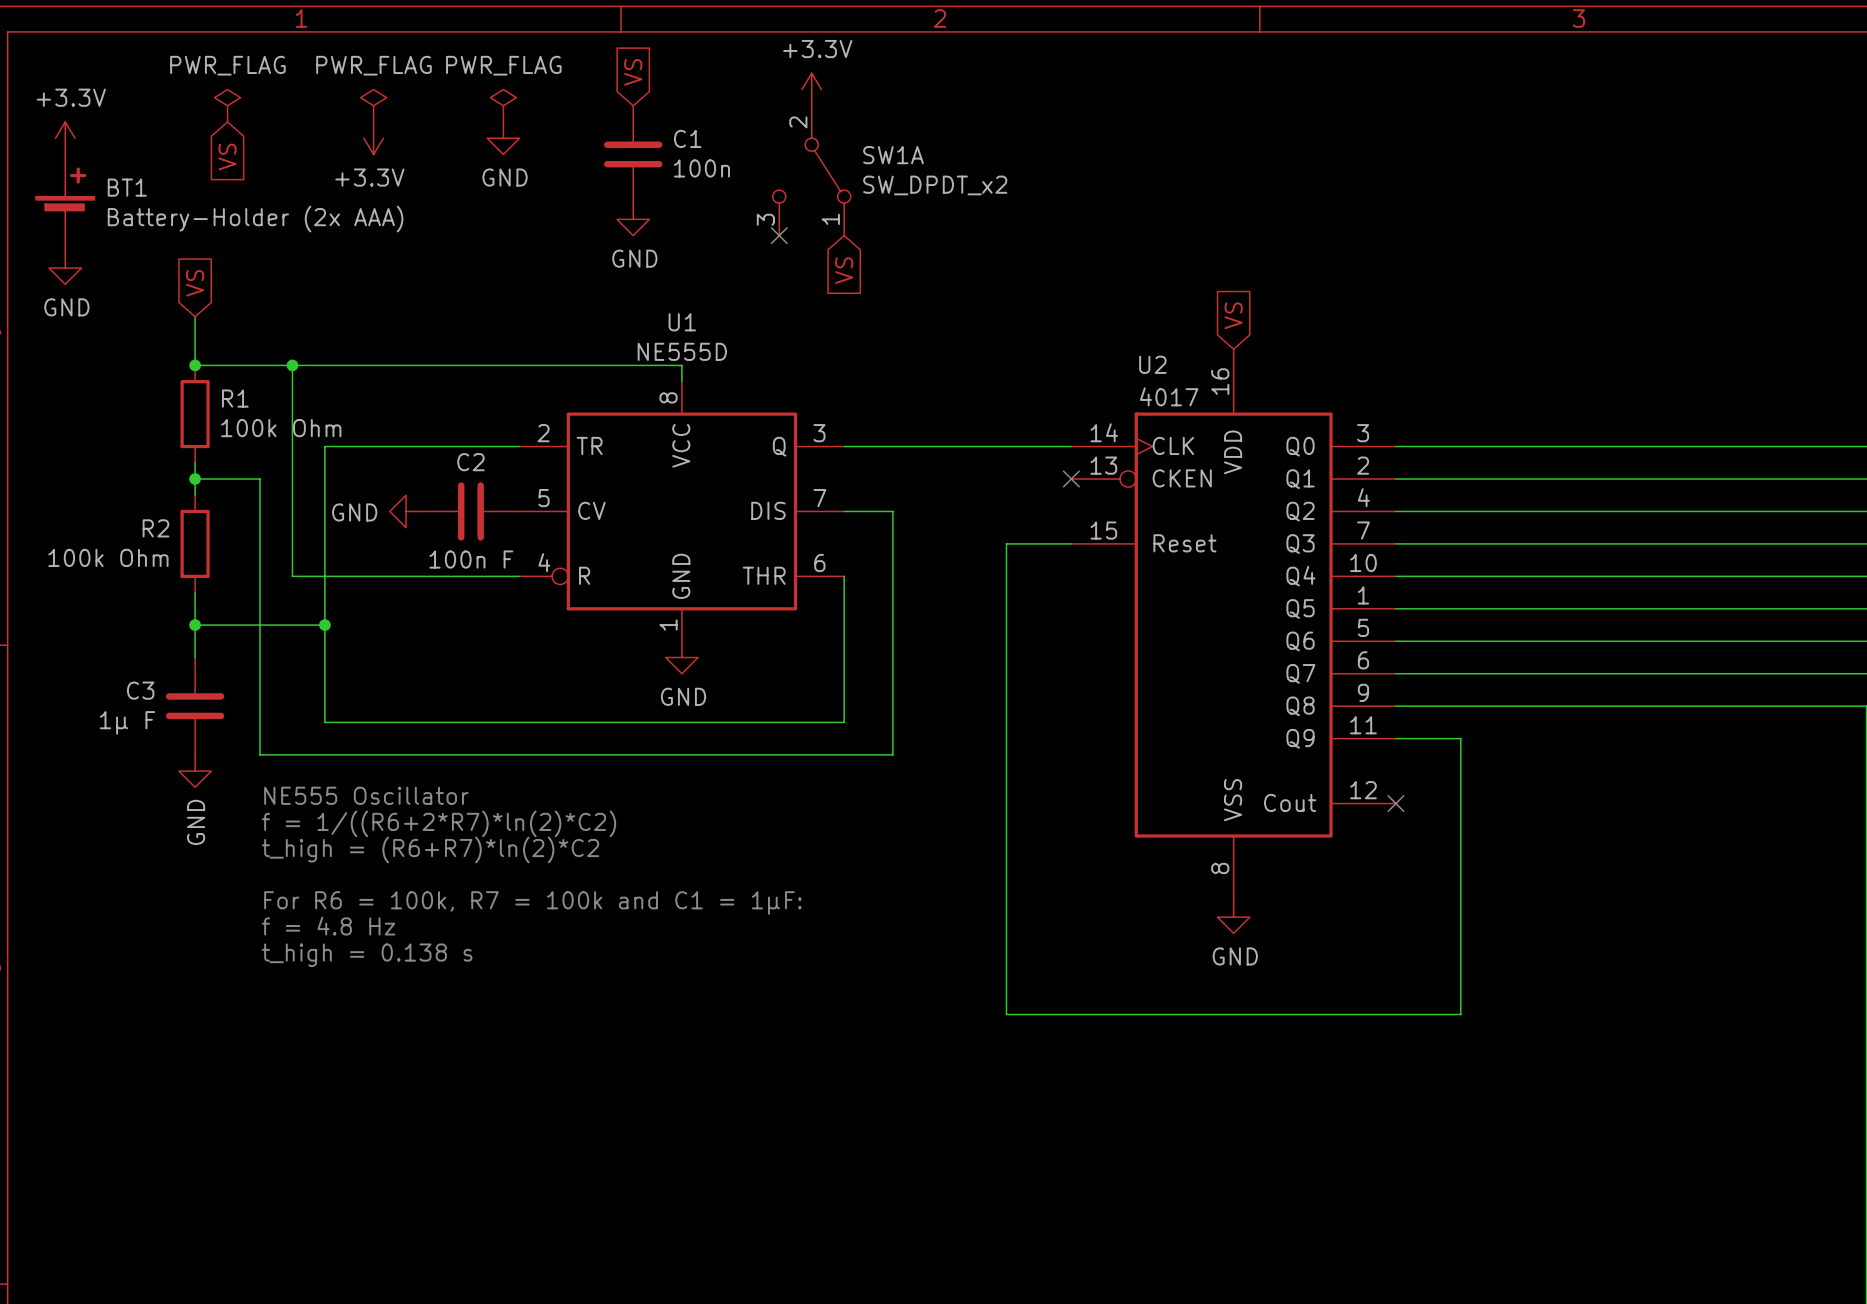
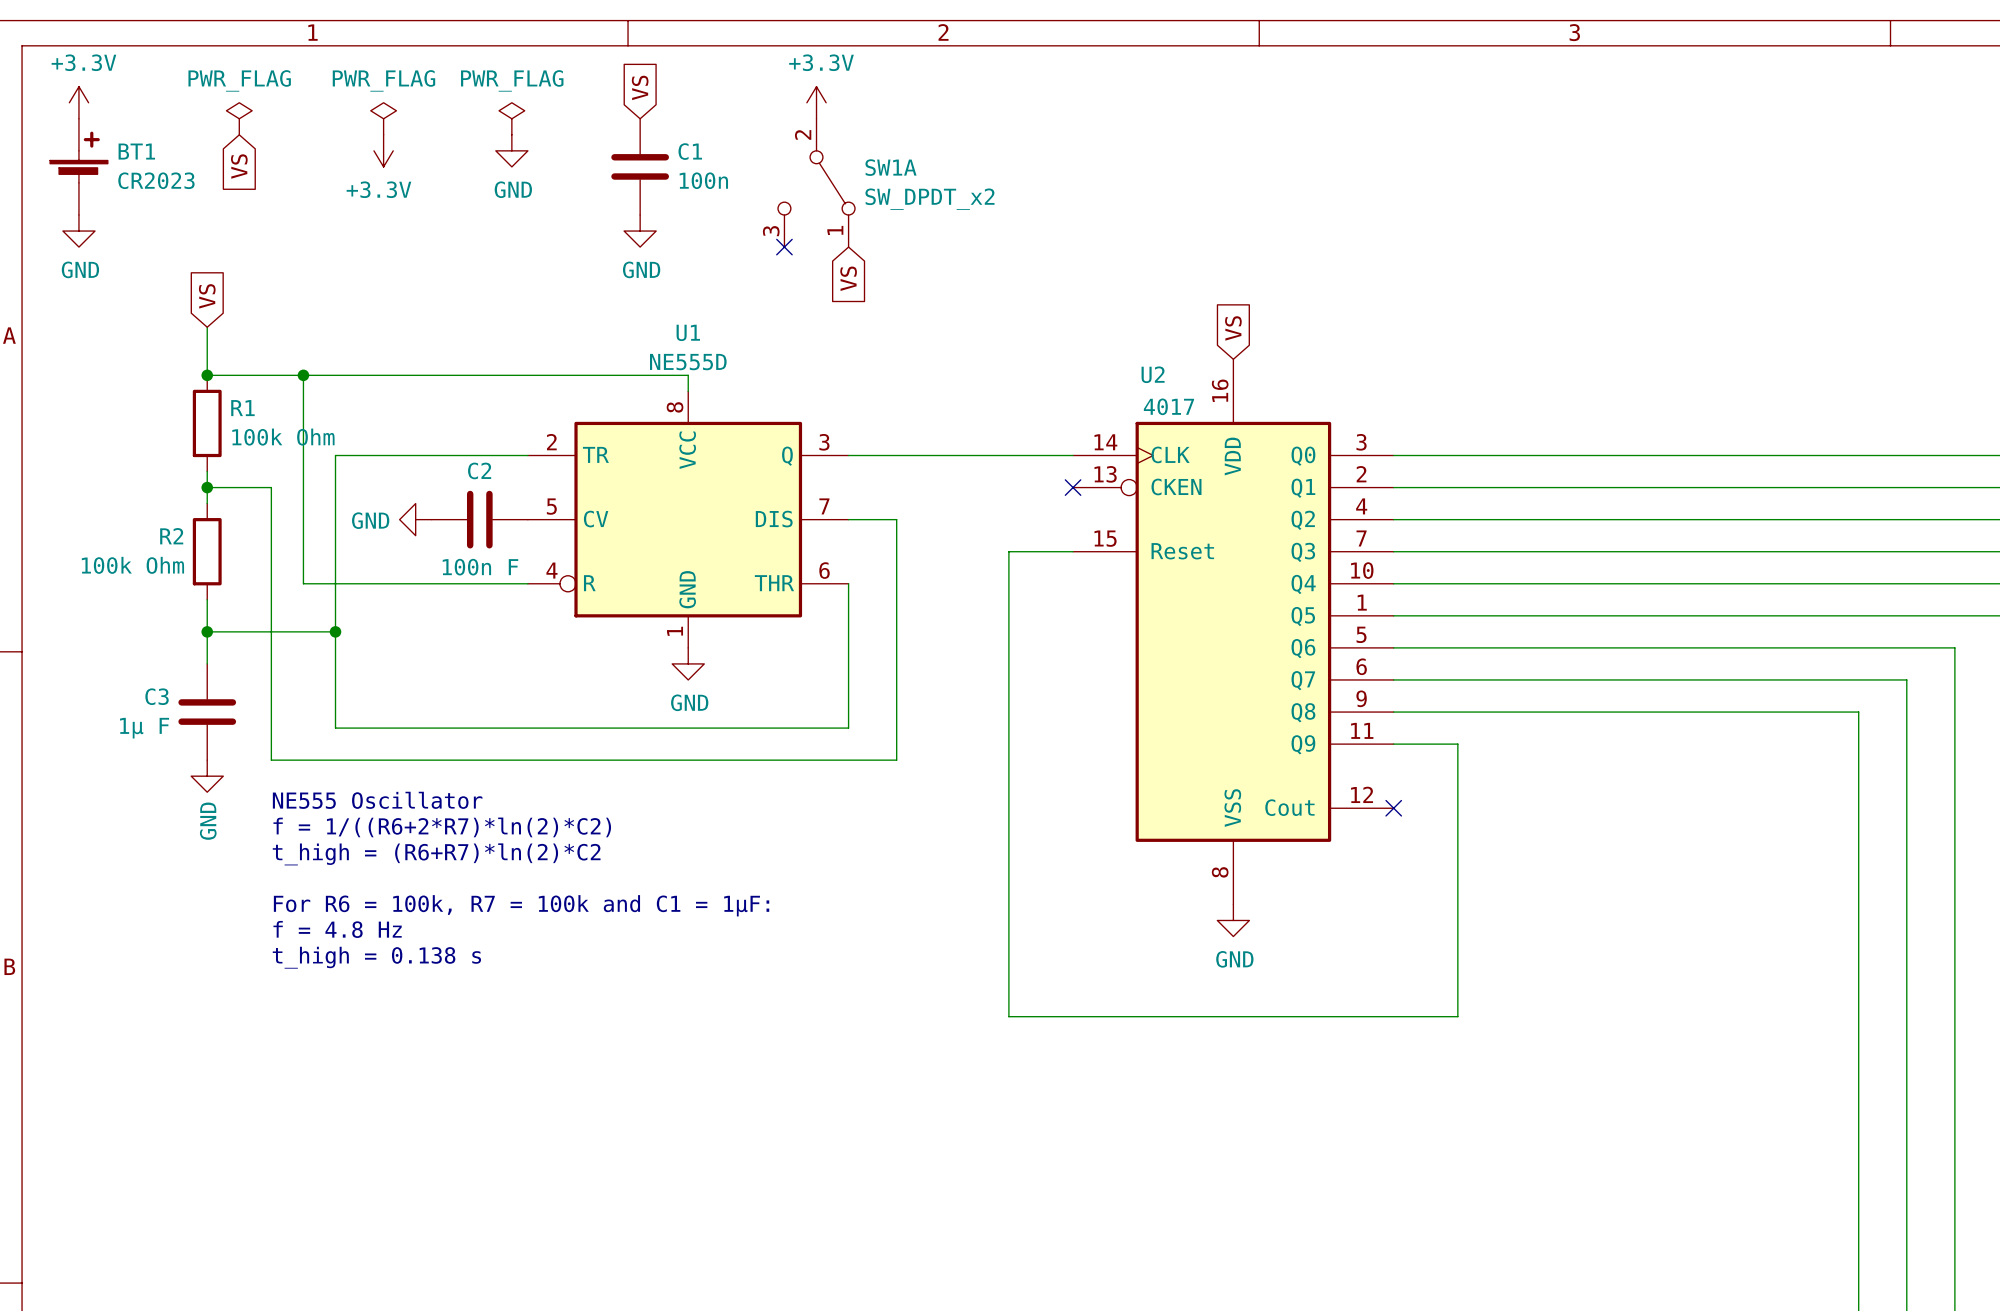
power symbol position: +3.3V (65, 138) -> +3.3V (78, 102)
BT1 position: (65, 203) -> (78, 166)
BT1 value: Battery-Holder (2x AAA) (255, 219) -> CR2023 (156, 180)
power symbol position: GND (65, 268) -> GND (78, 231)

